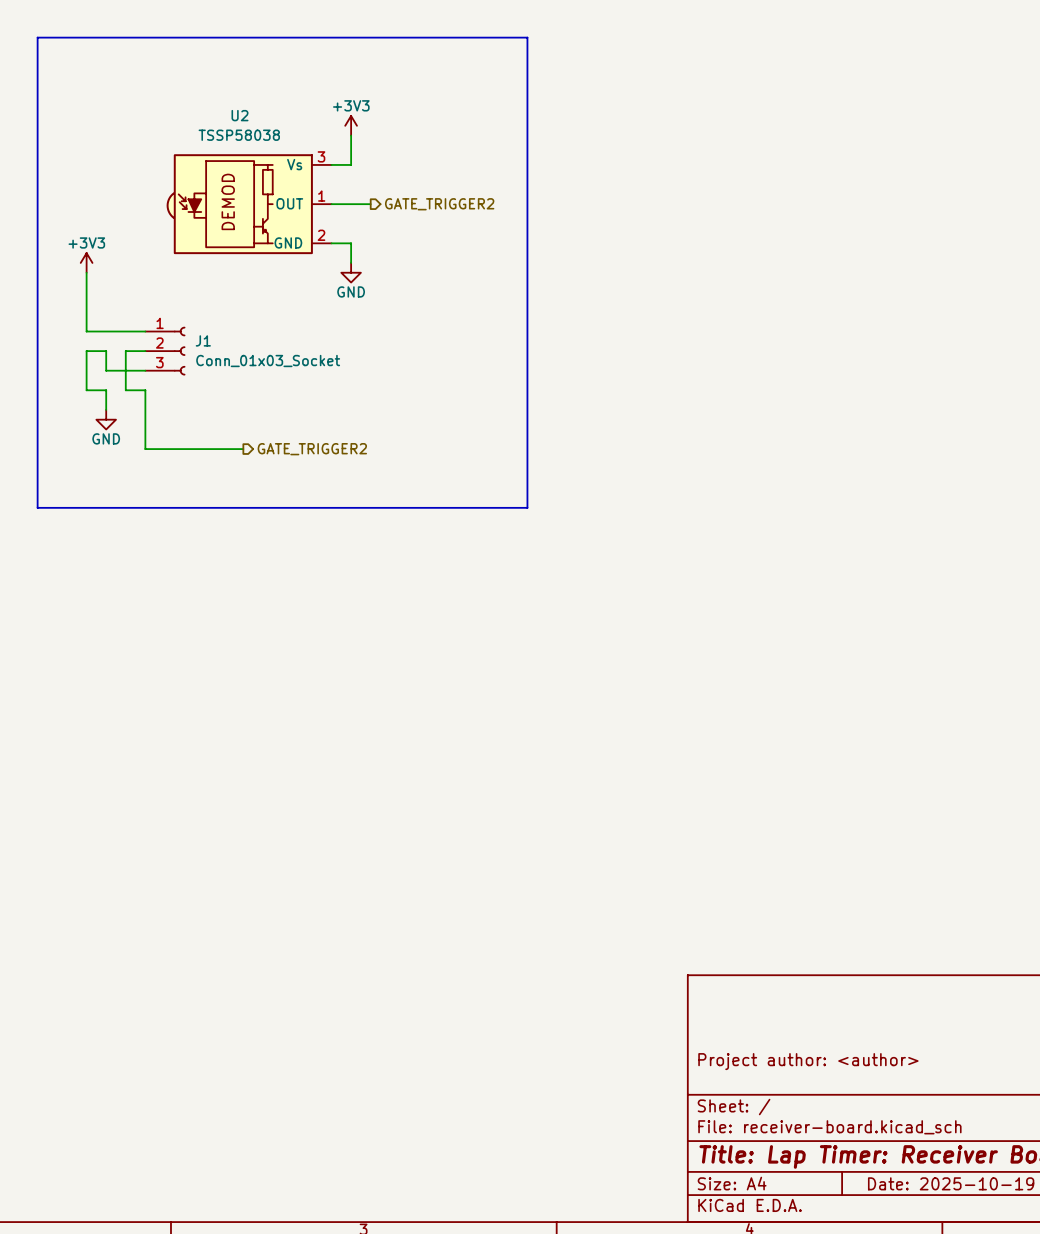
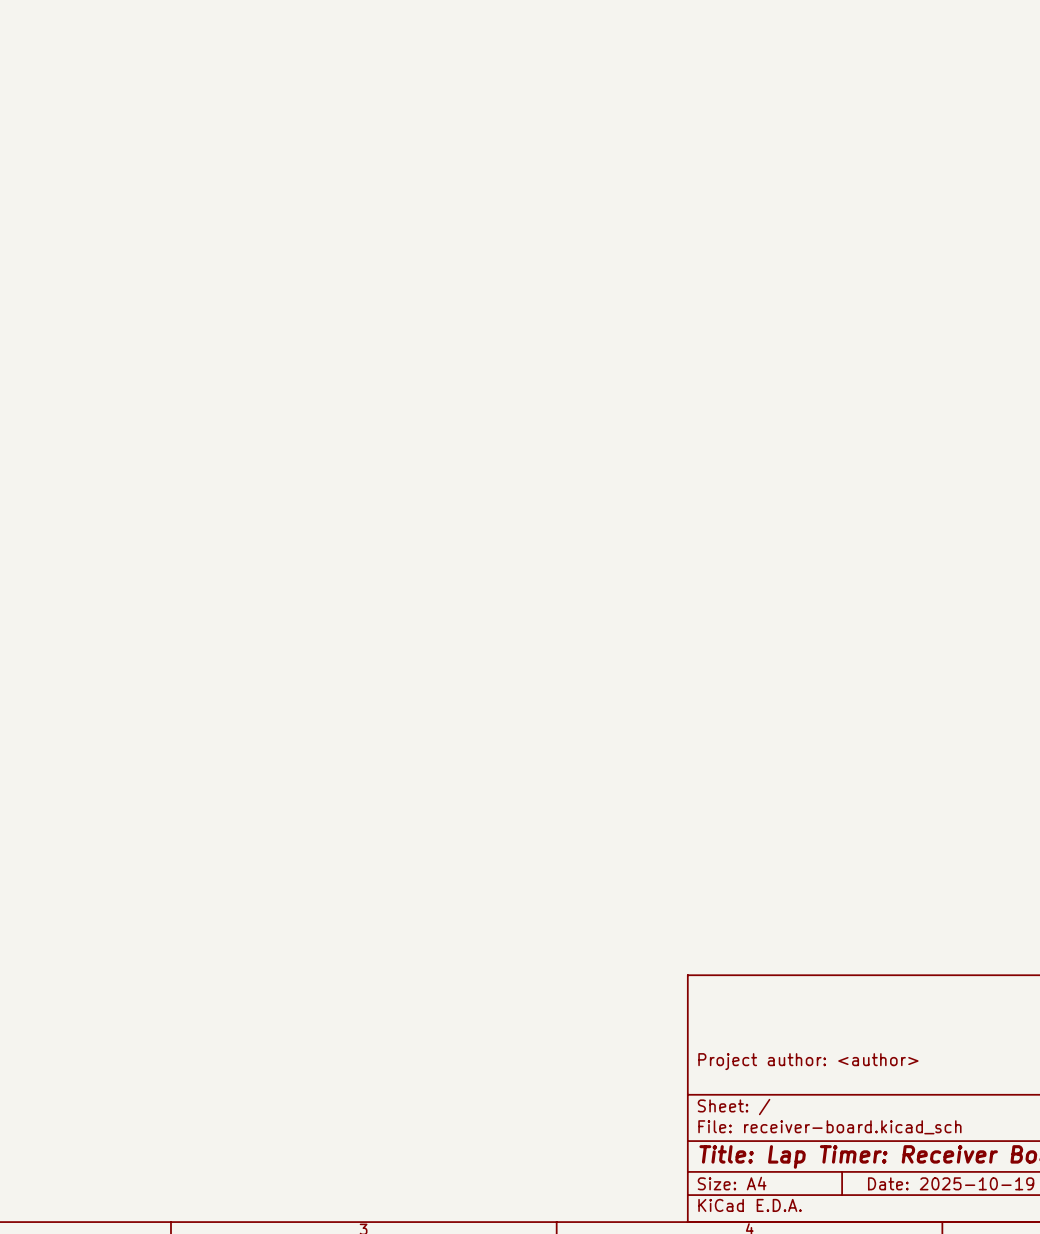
line: (37, 37) (527, 37) (527, 507) (37, 507) (37, 37) -> none
power symbol: +3V3 (351, 125) -> none
wire: (351, 135) (351, 164) (331, 164) -> none
U2: TSSP58038 (249, 204) -> none
wire: (331, 204) (370, 204) -> none
hierarchical label: GATE_TRIGGER2 (439, 204) -> none
wire: (331, 243) (351, 243) (351, 262) -> none
power symbol: +3V3 (86, 262) -> none
wire: (86, 272) (86, 331) (145, 331) -> none
power symbol: GND (351, 272) -> none
wire: (145, 351) (125, 351) (125, 390) (145, 390) (145, 449) (243, 449) -> none
J1: Conn_01x03_Socket (165, 351) -> none
wire: (145, 370) (106, 370) (106, 351) (86, 351) (86, 390) (106, 390) (106, 409) -> none
power symbol: GND (106, 419) -> none
hierarchical label: GATE_TRIGGER2 (312, 449) -> none

